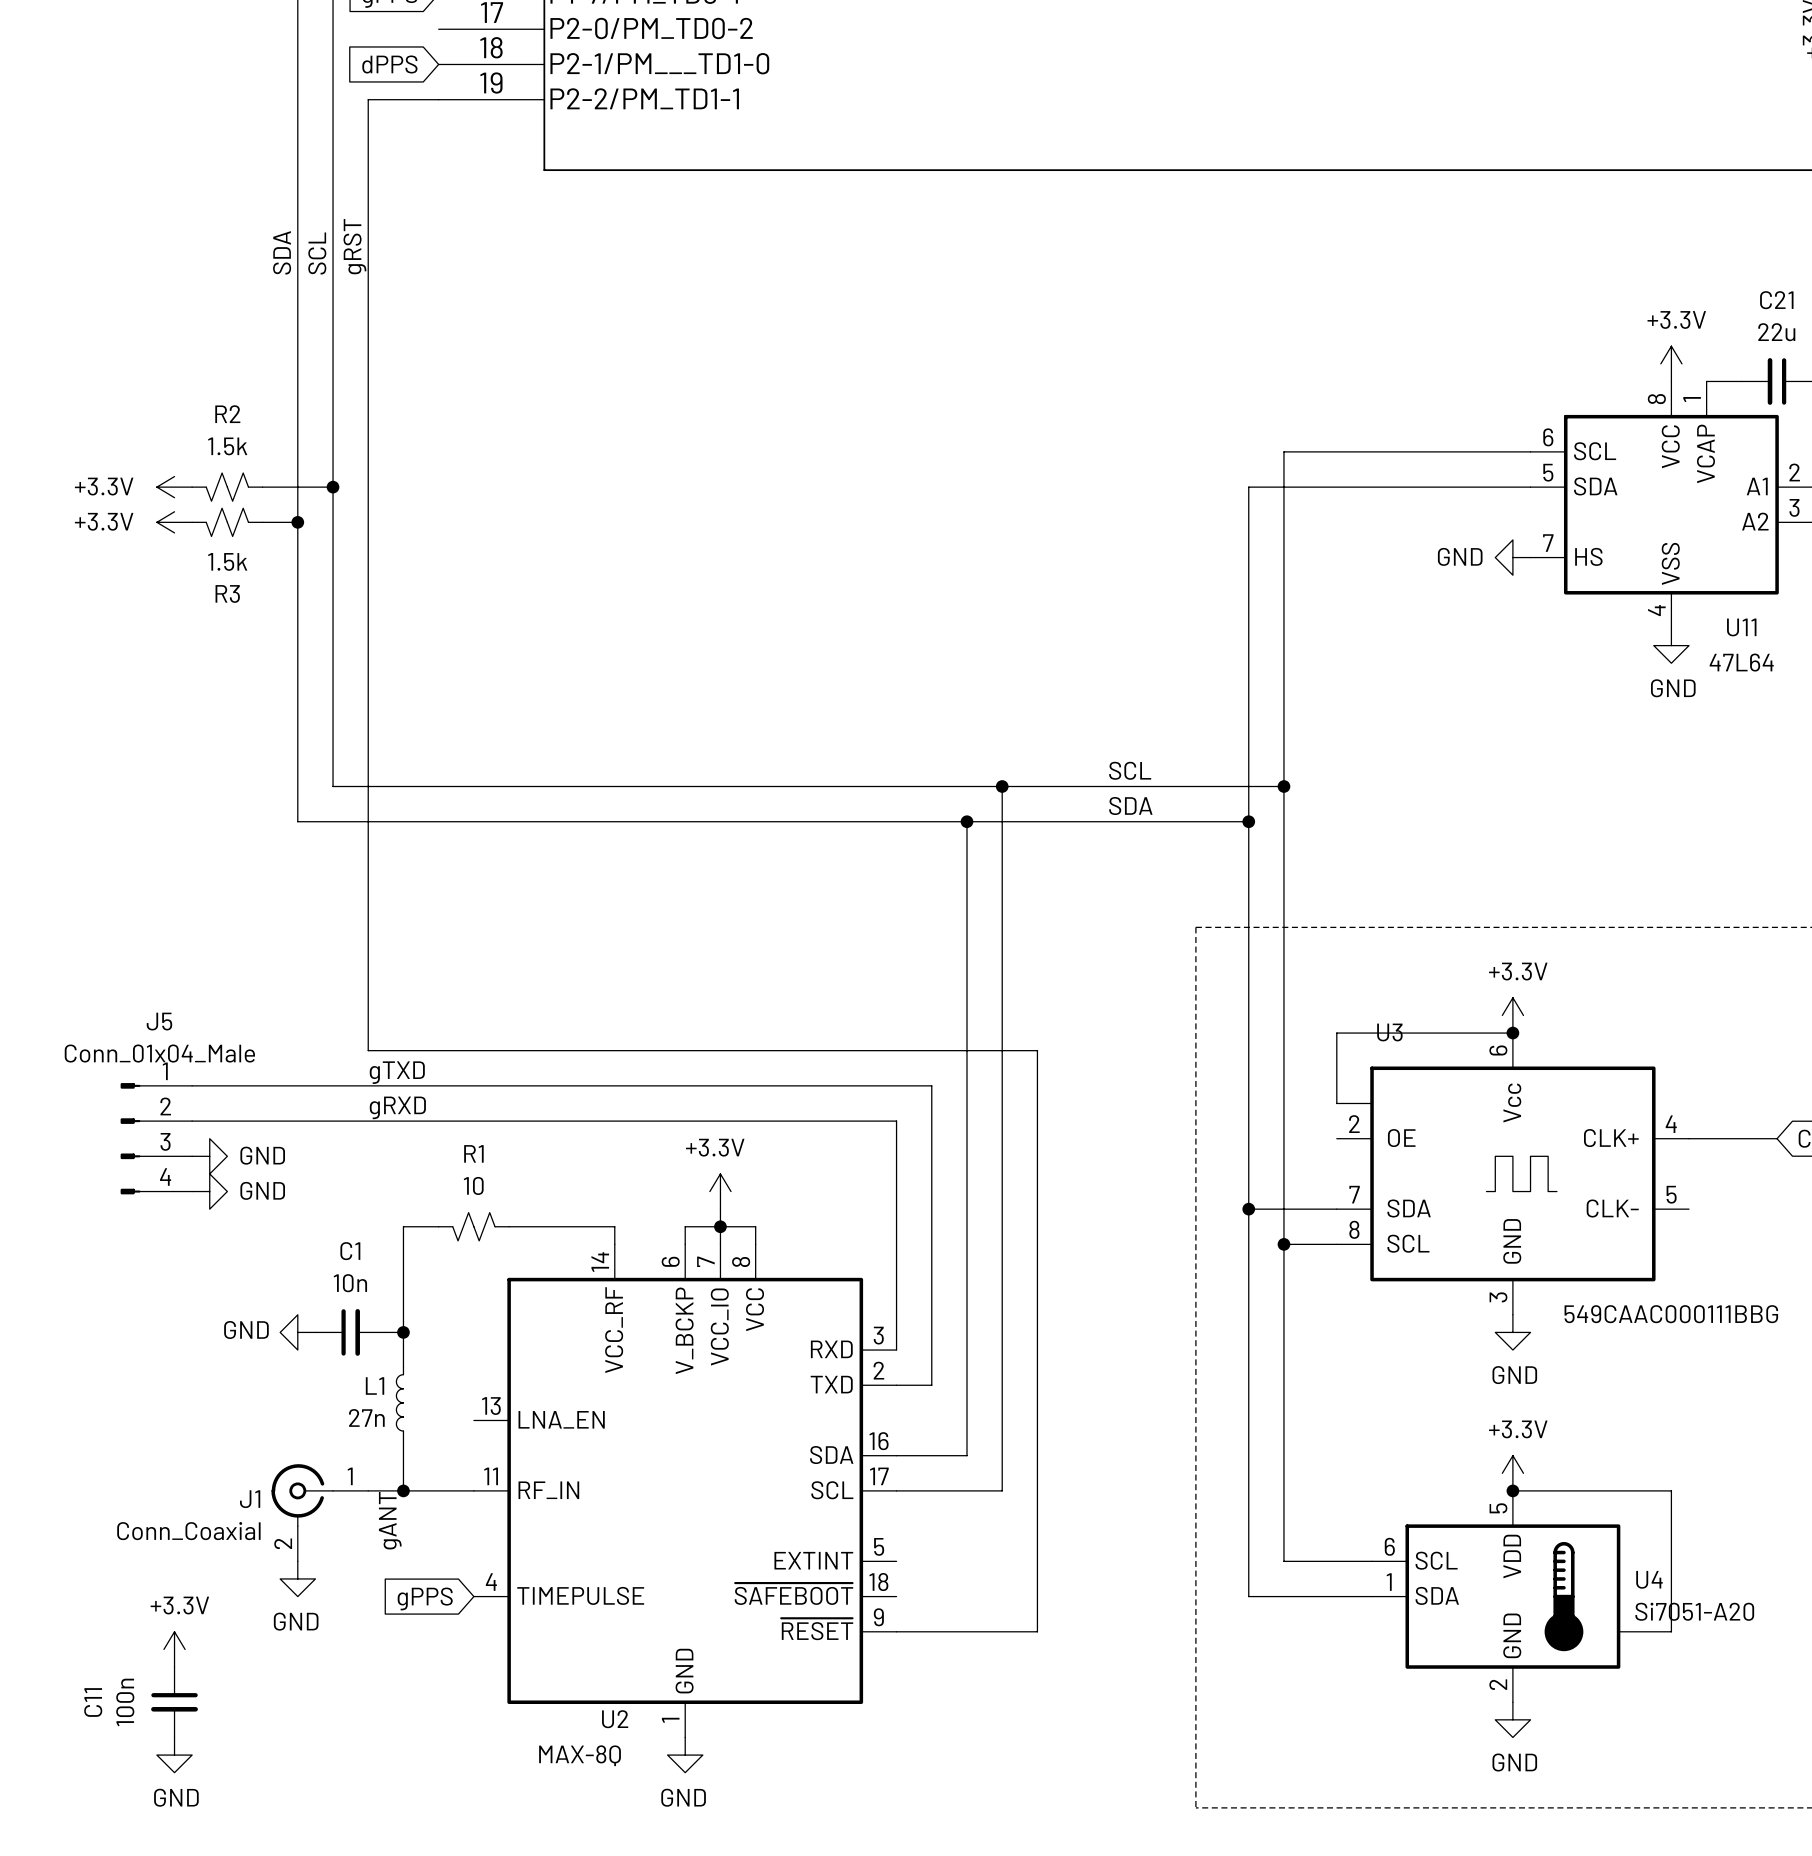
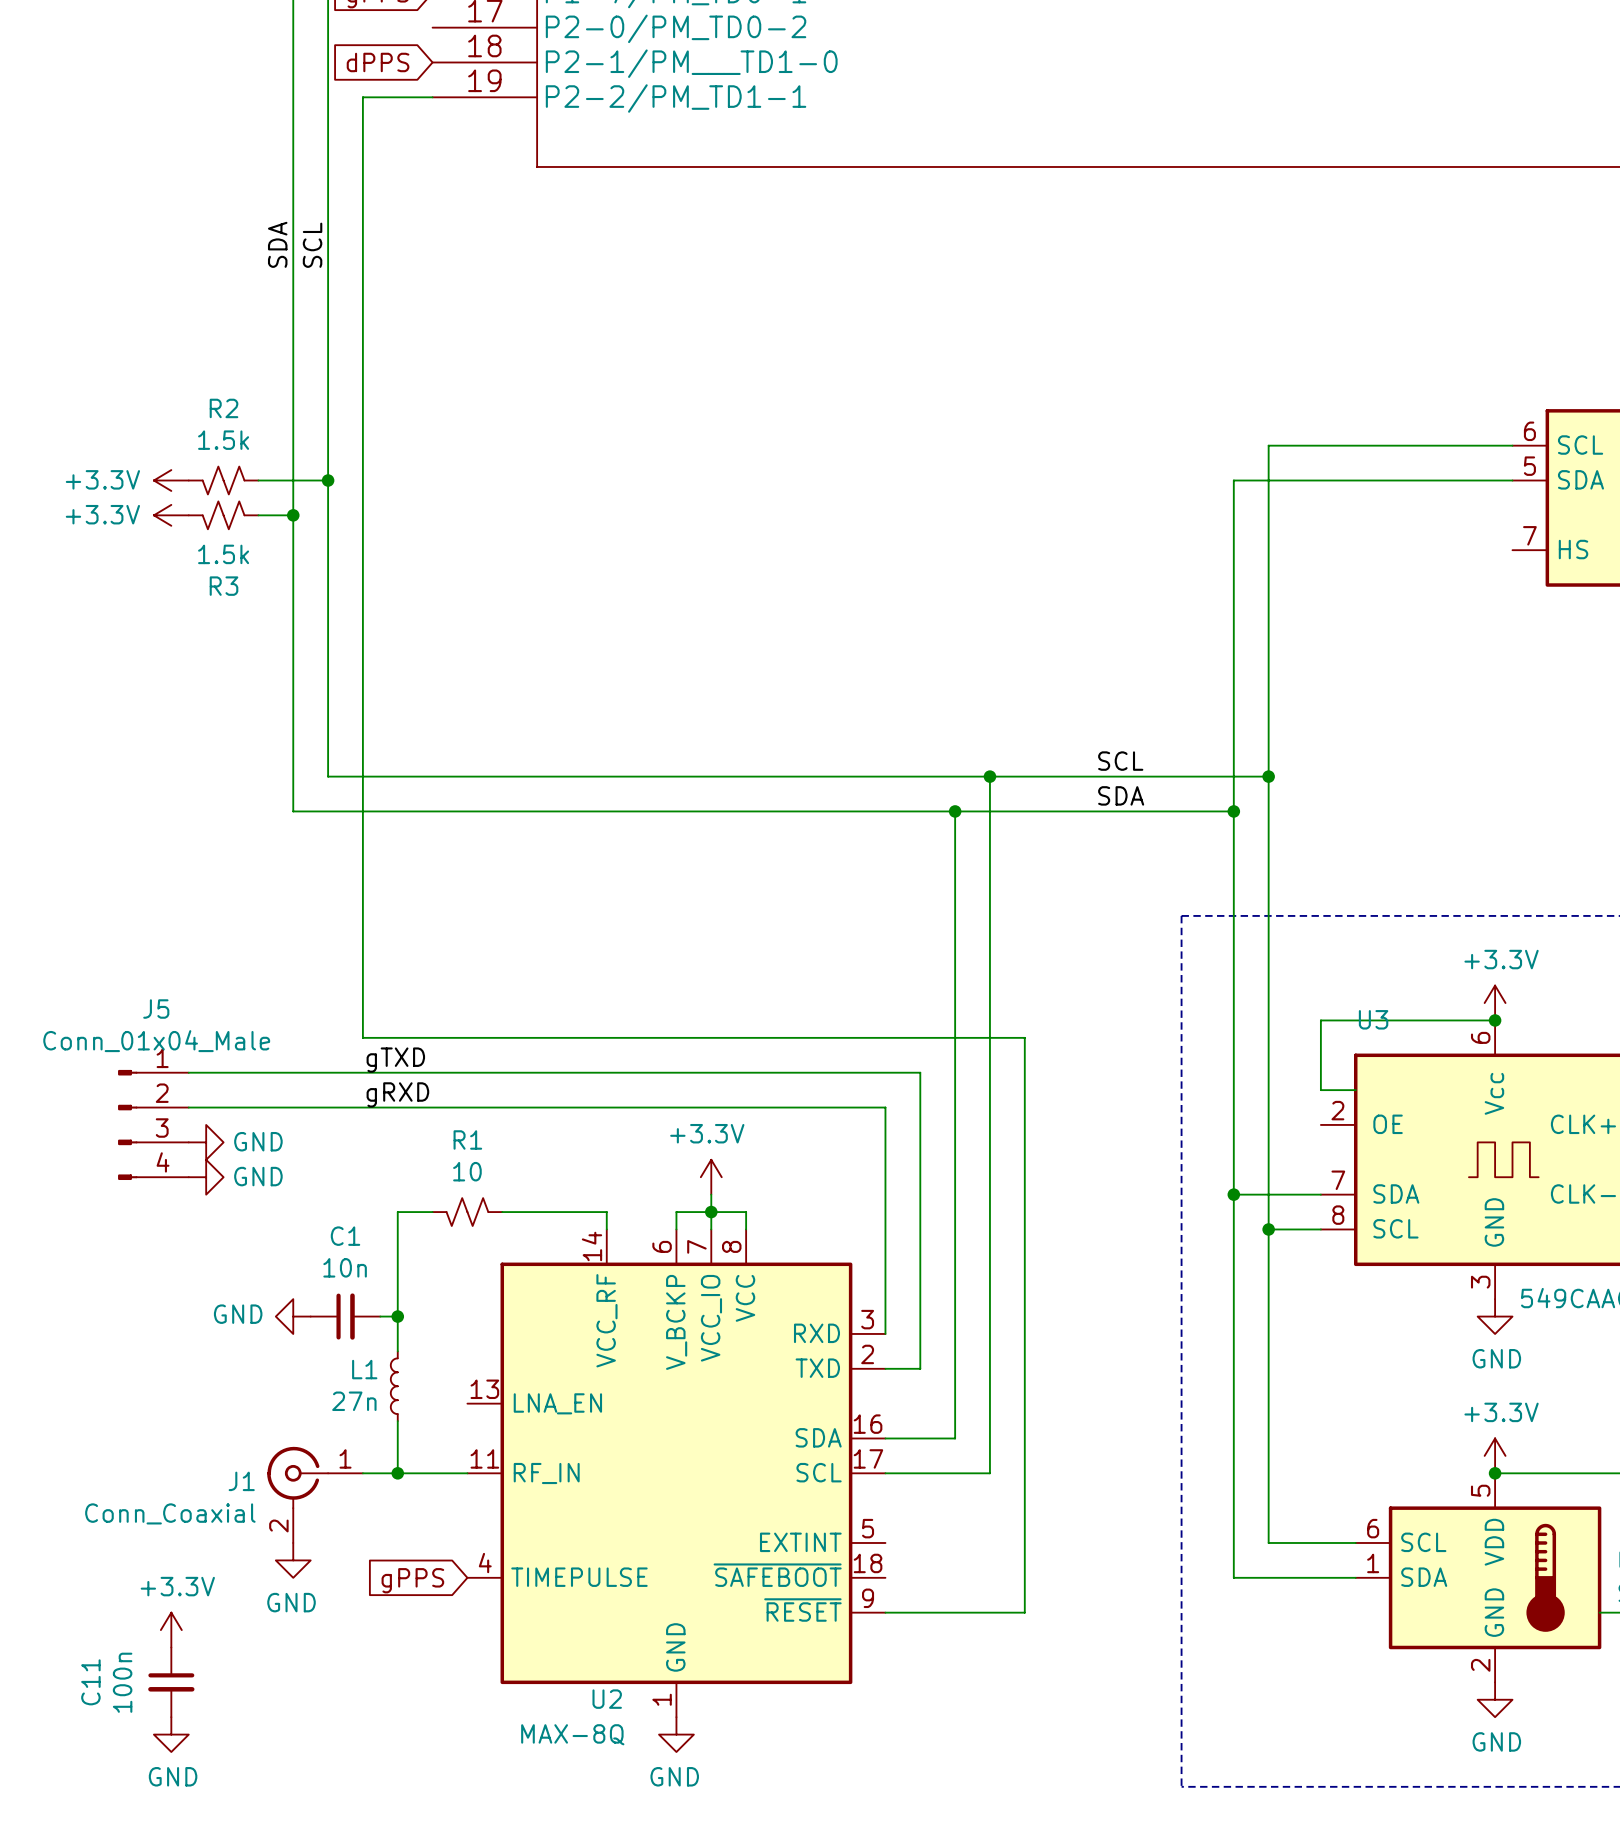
label: gRST (354, 246) -> none
power symbol: GND (1512, 557) -> none
label: gANT (390, 1520) -> none

